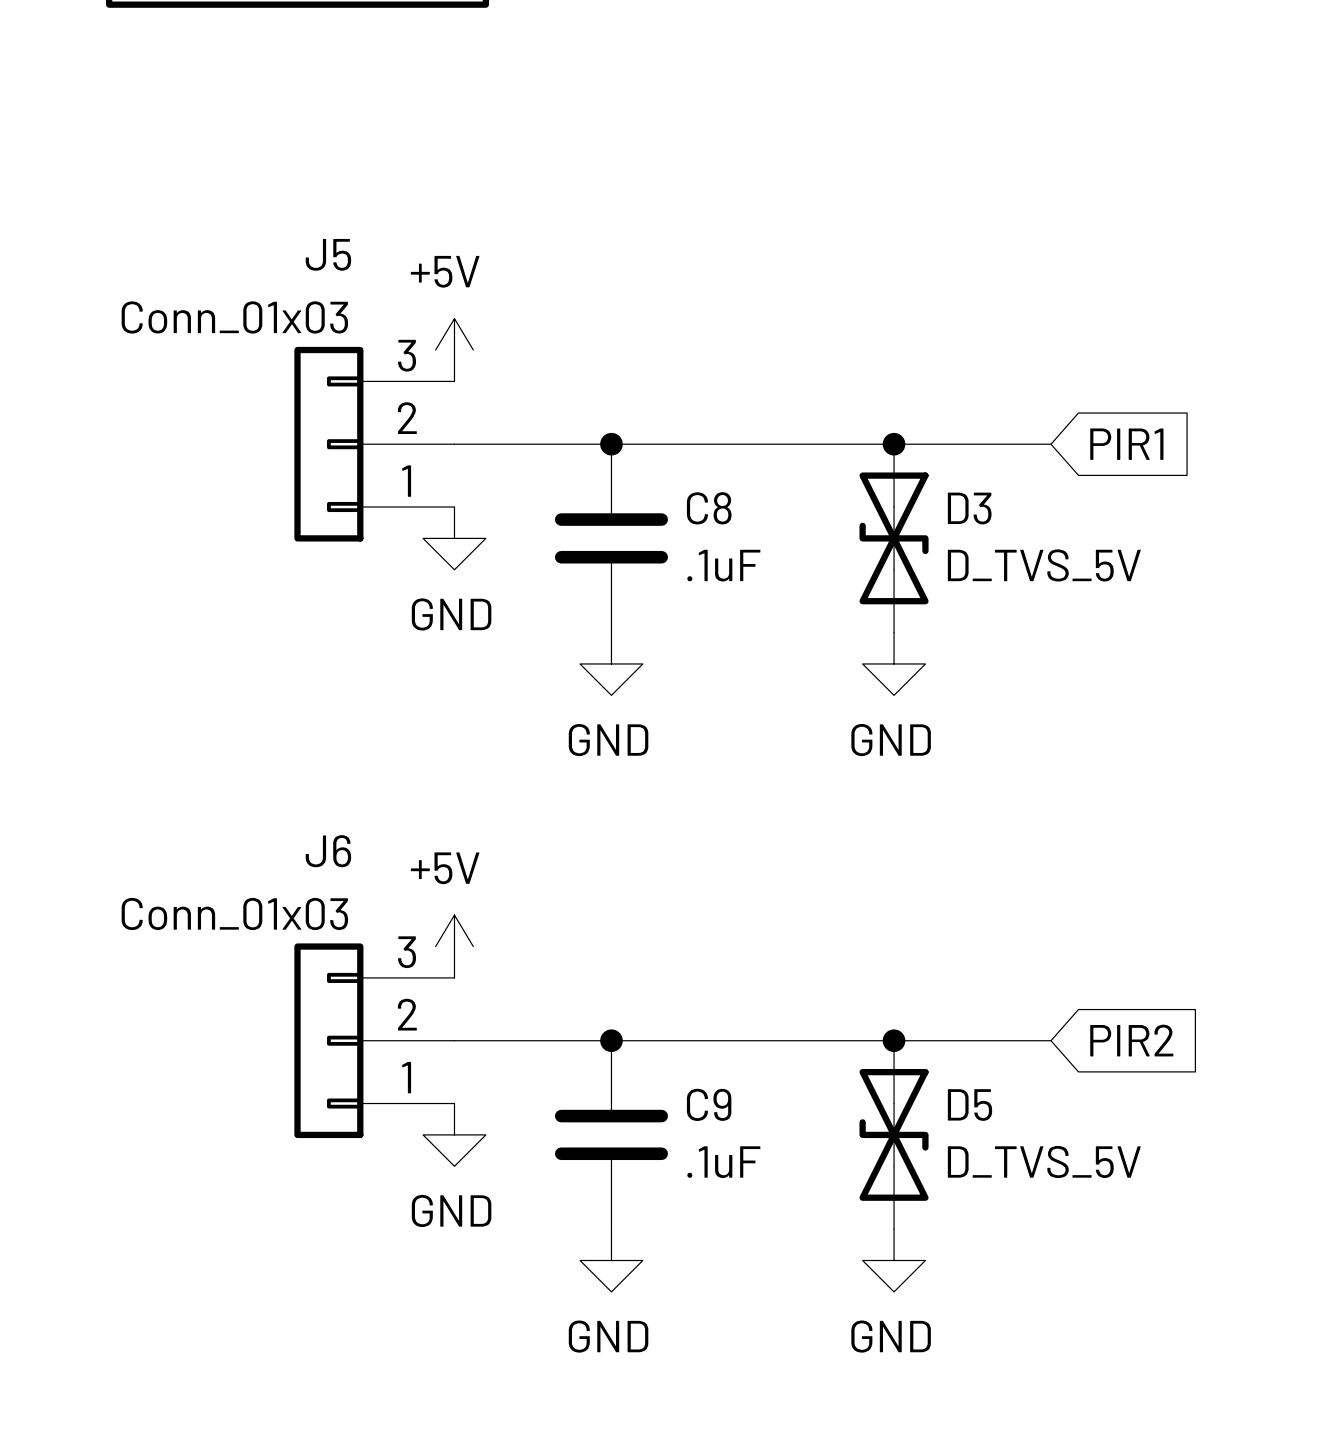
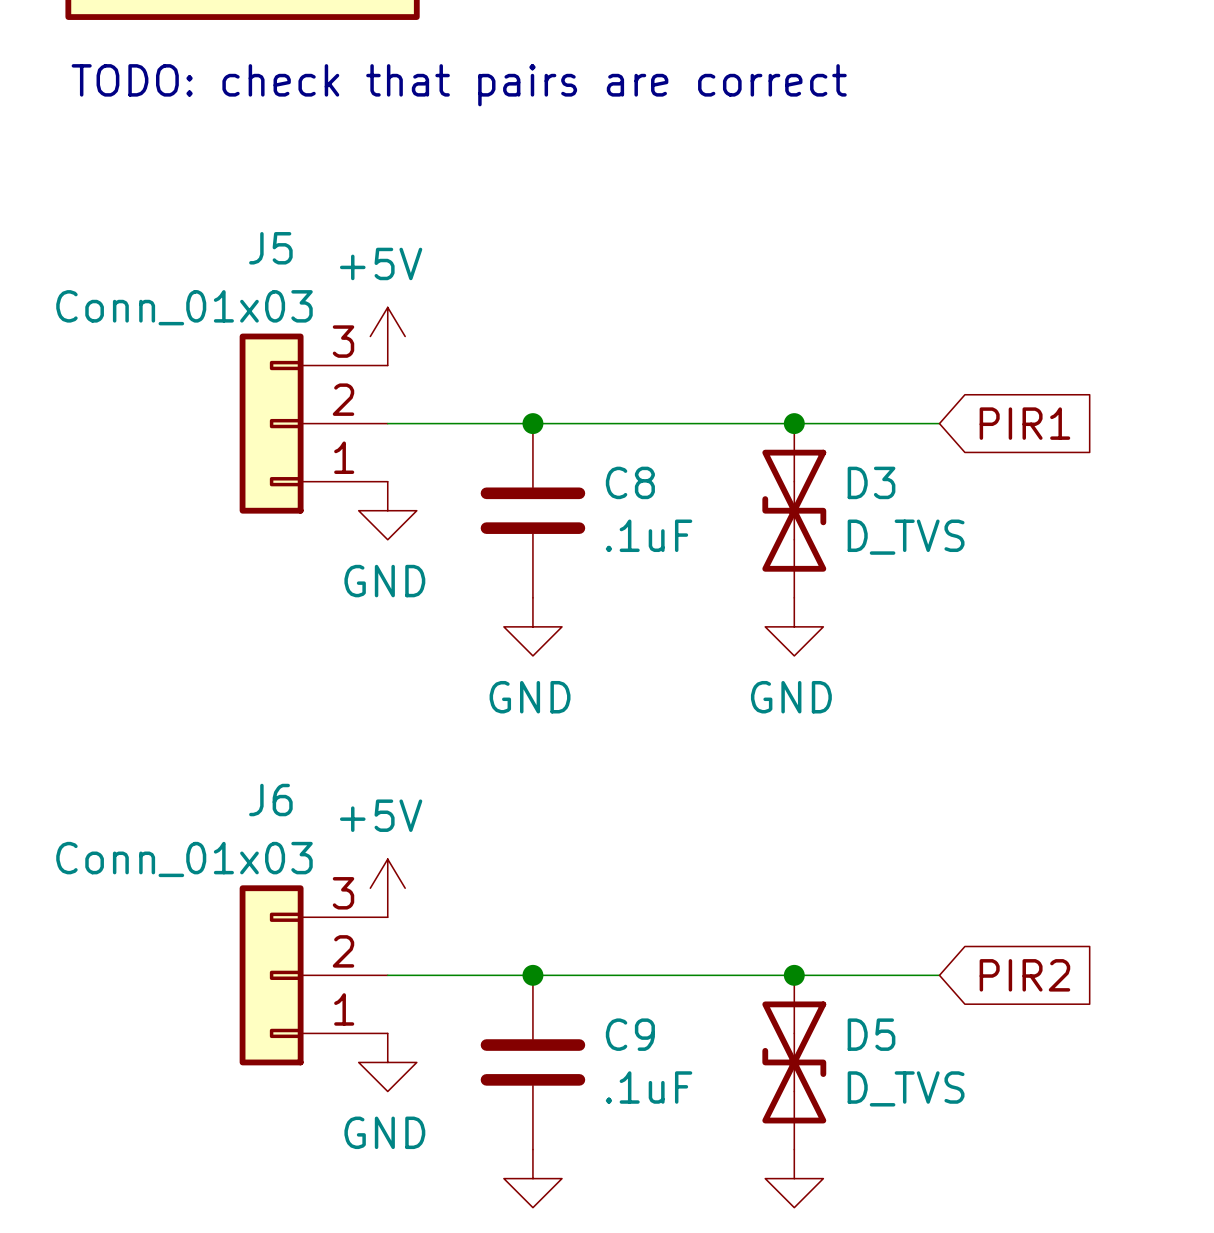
text: none -> TODO: check that pairs are correct (459, 85)
D3 value: D_TVS_5V (1044, 565) -> D_TVS (906, 537)
D5 value: D_TVS_5V (1044, 1162) -> D_TVS (906, 1088)

